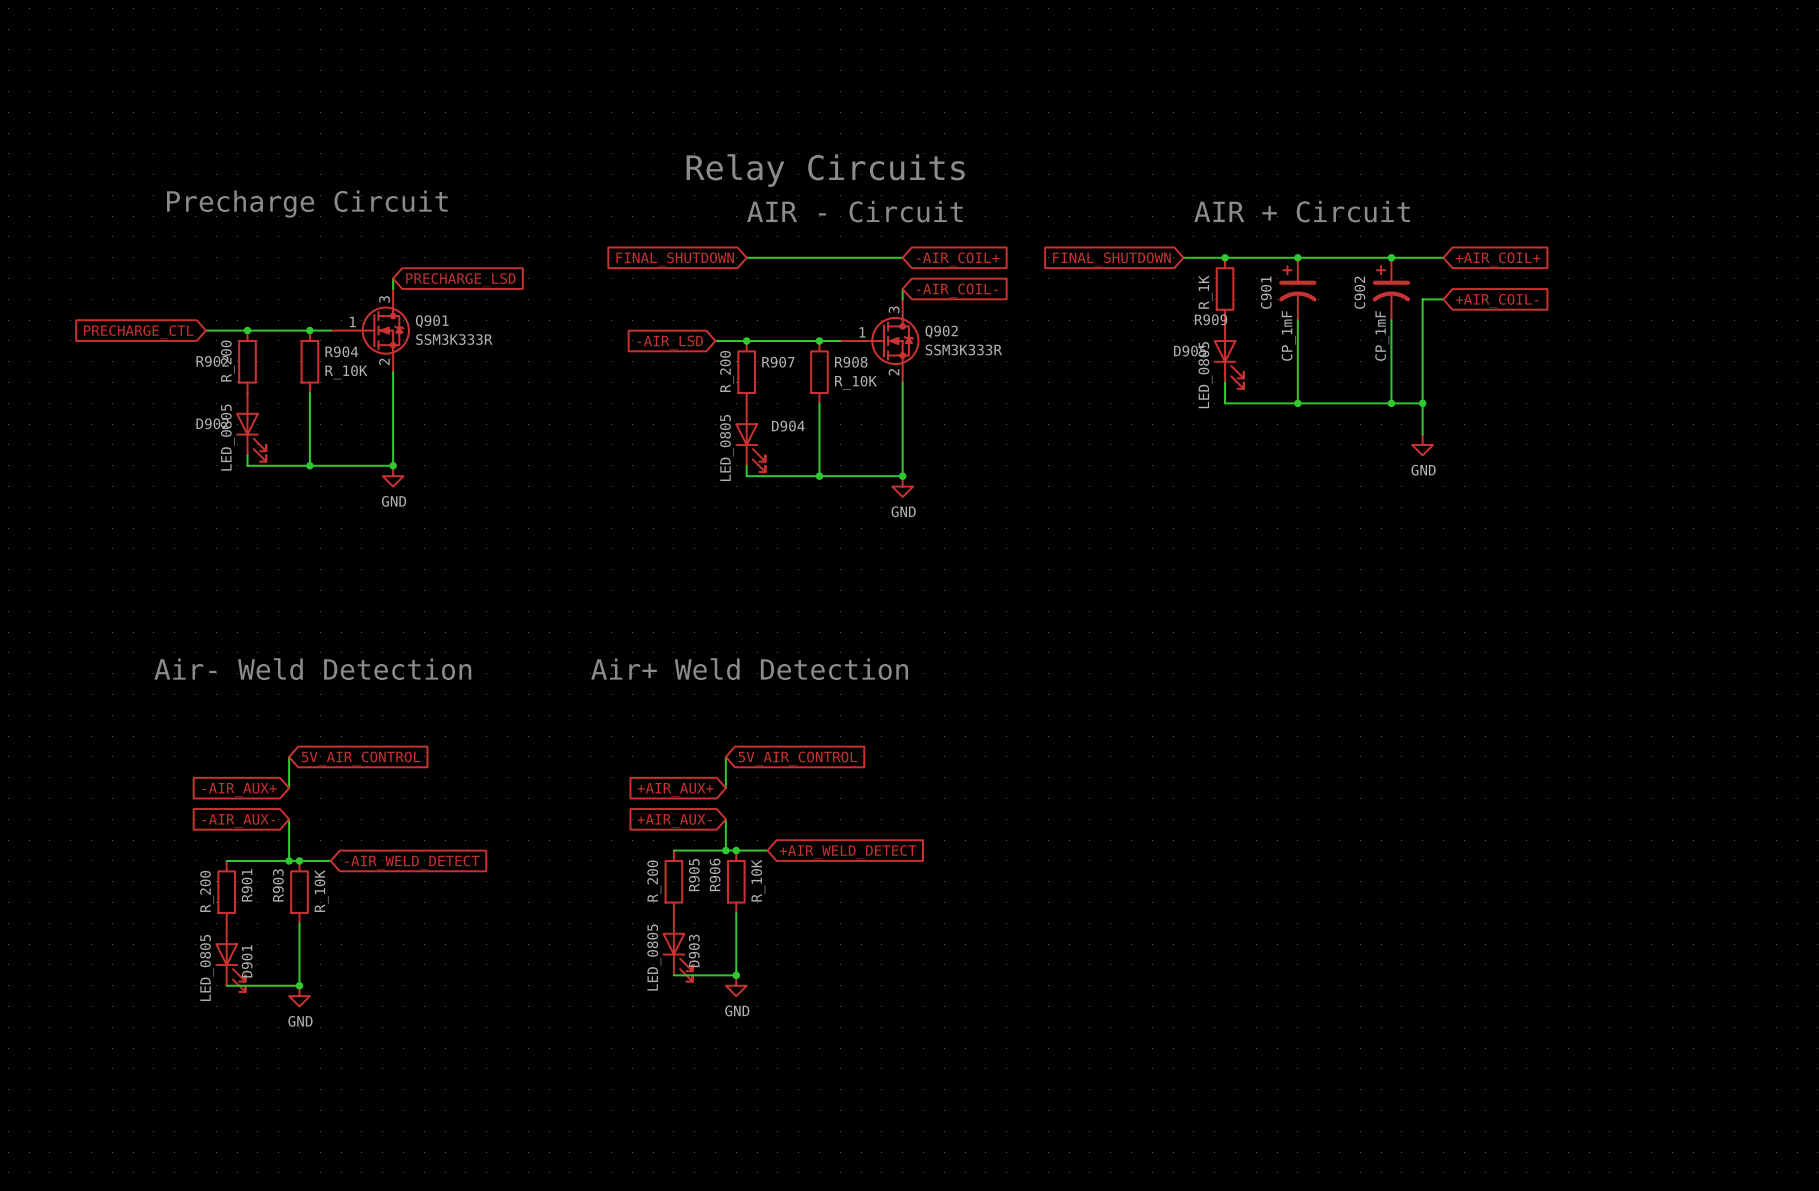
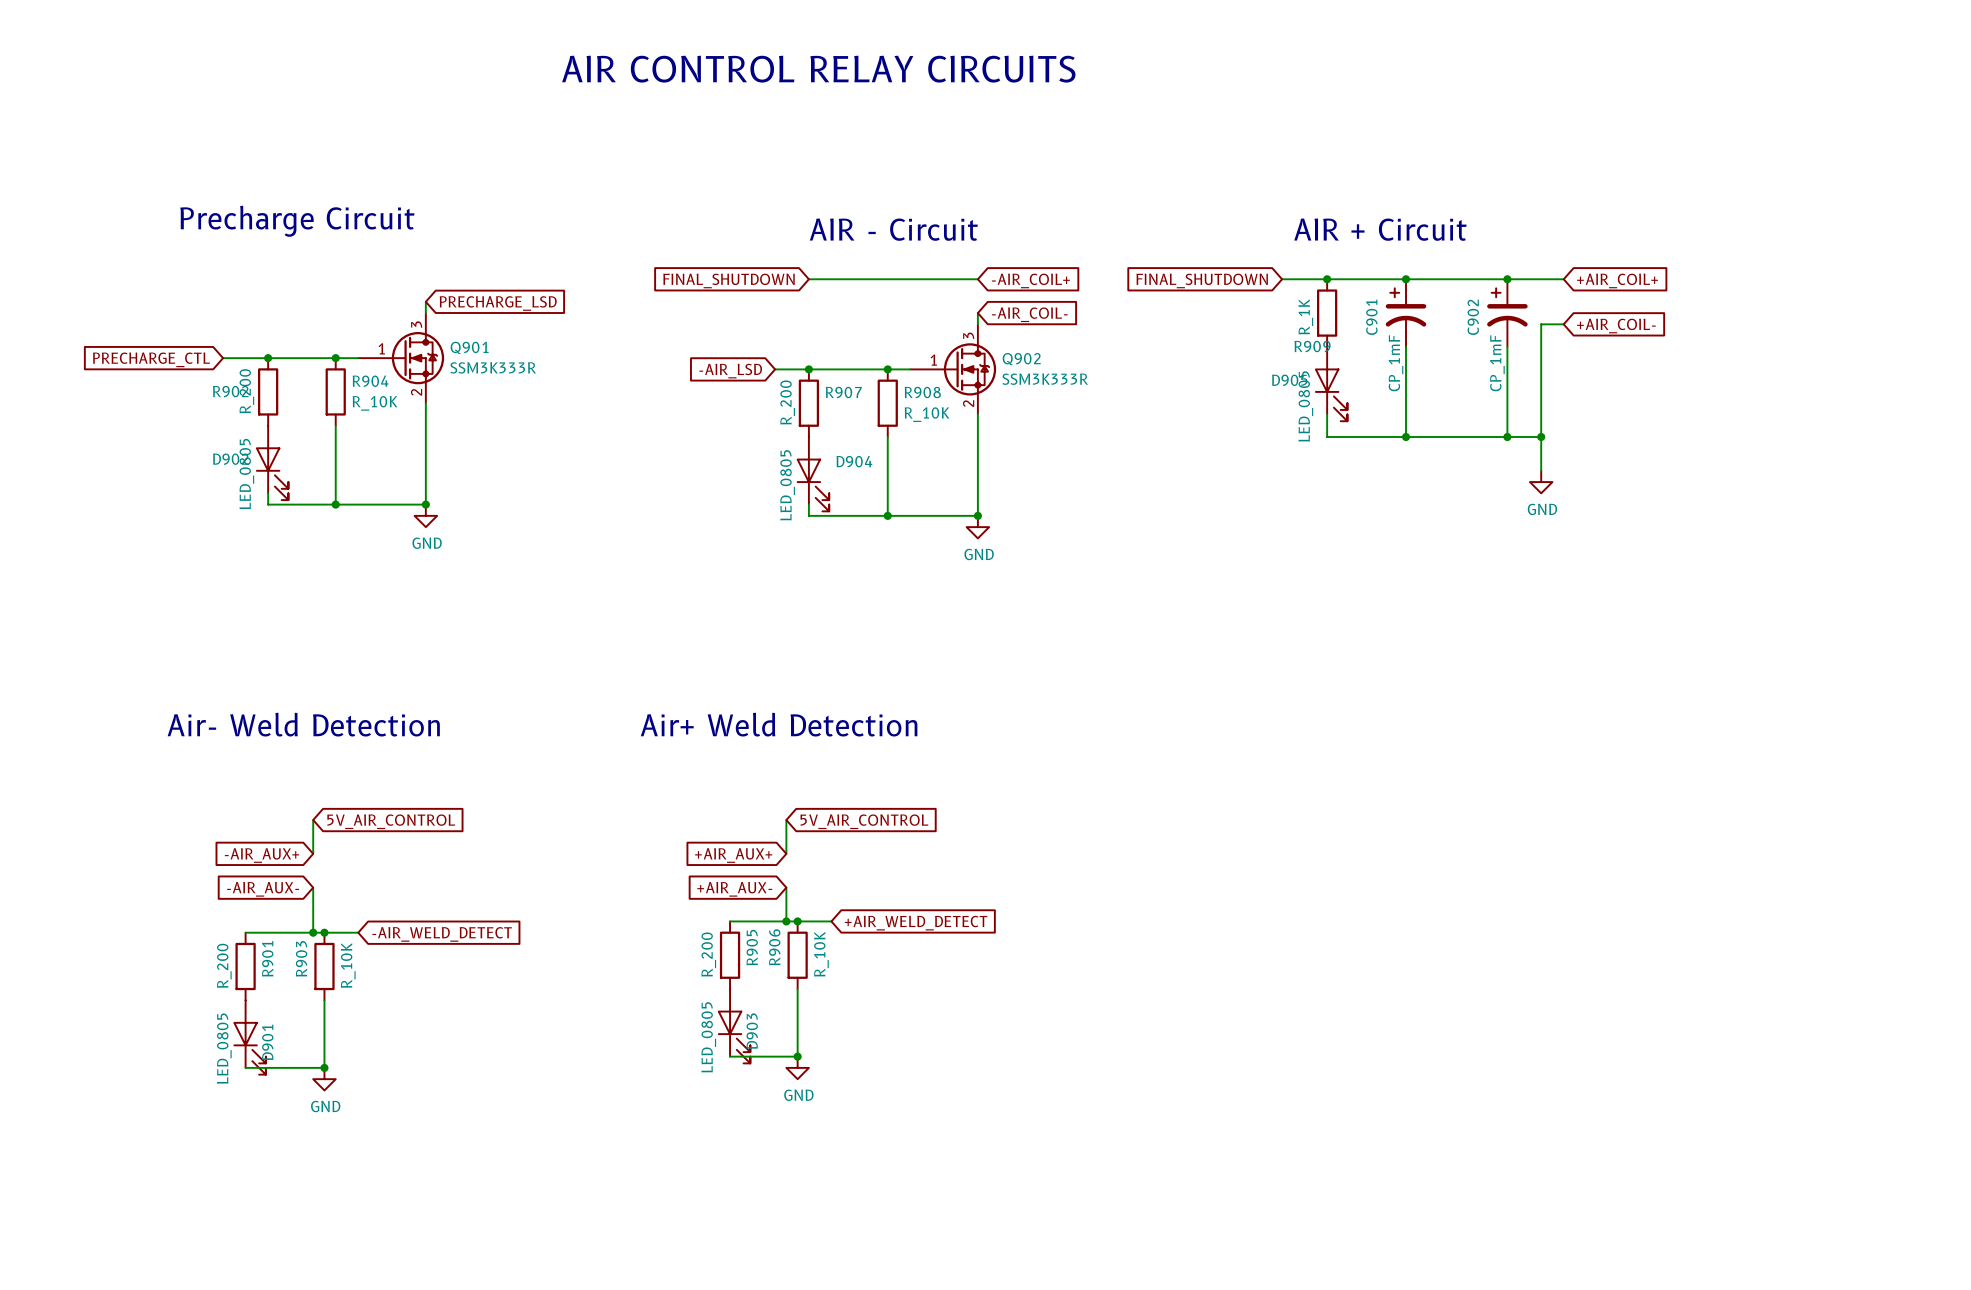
text: none -> AIR CONTROL RELAY CIRCUITS (818, 69)
text: Relay Circuits (825, 170) -> none

